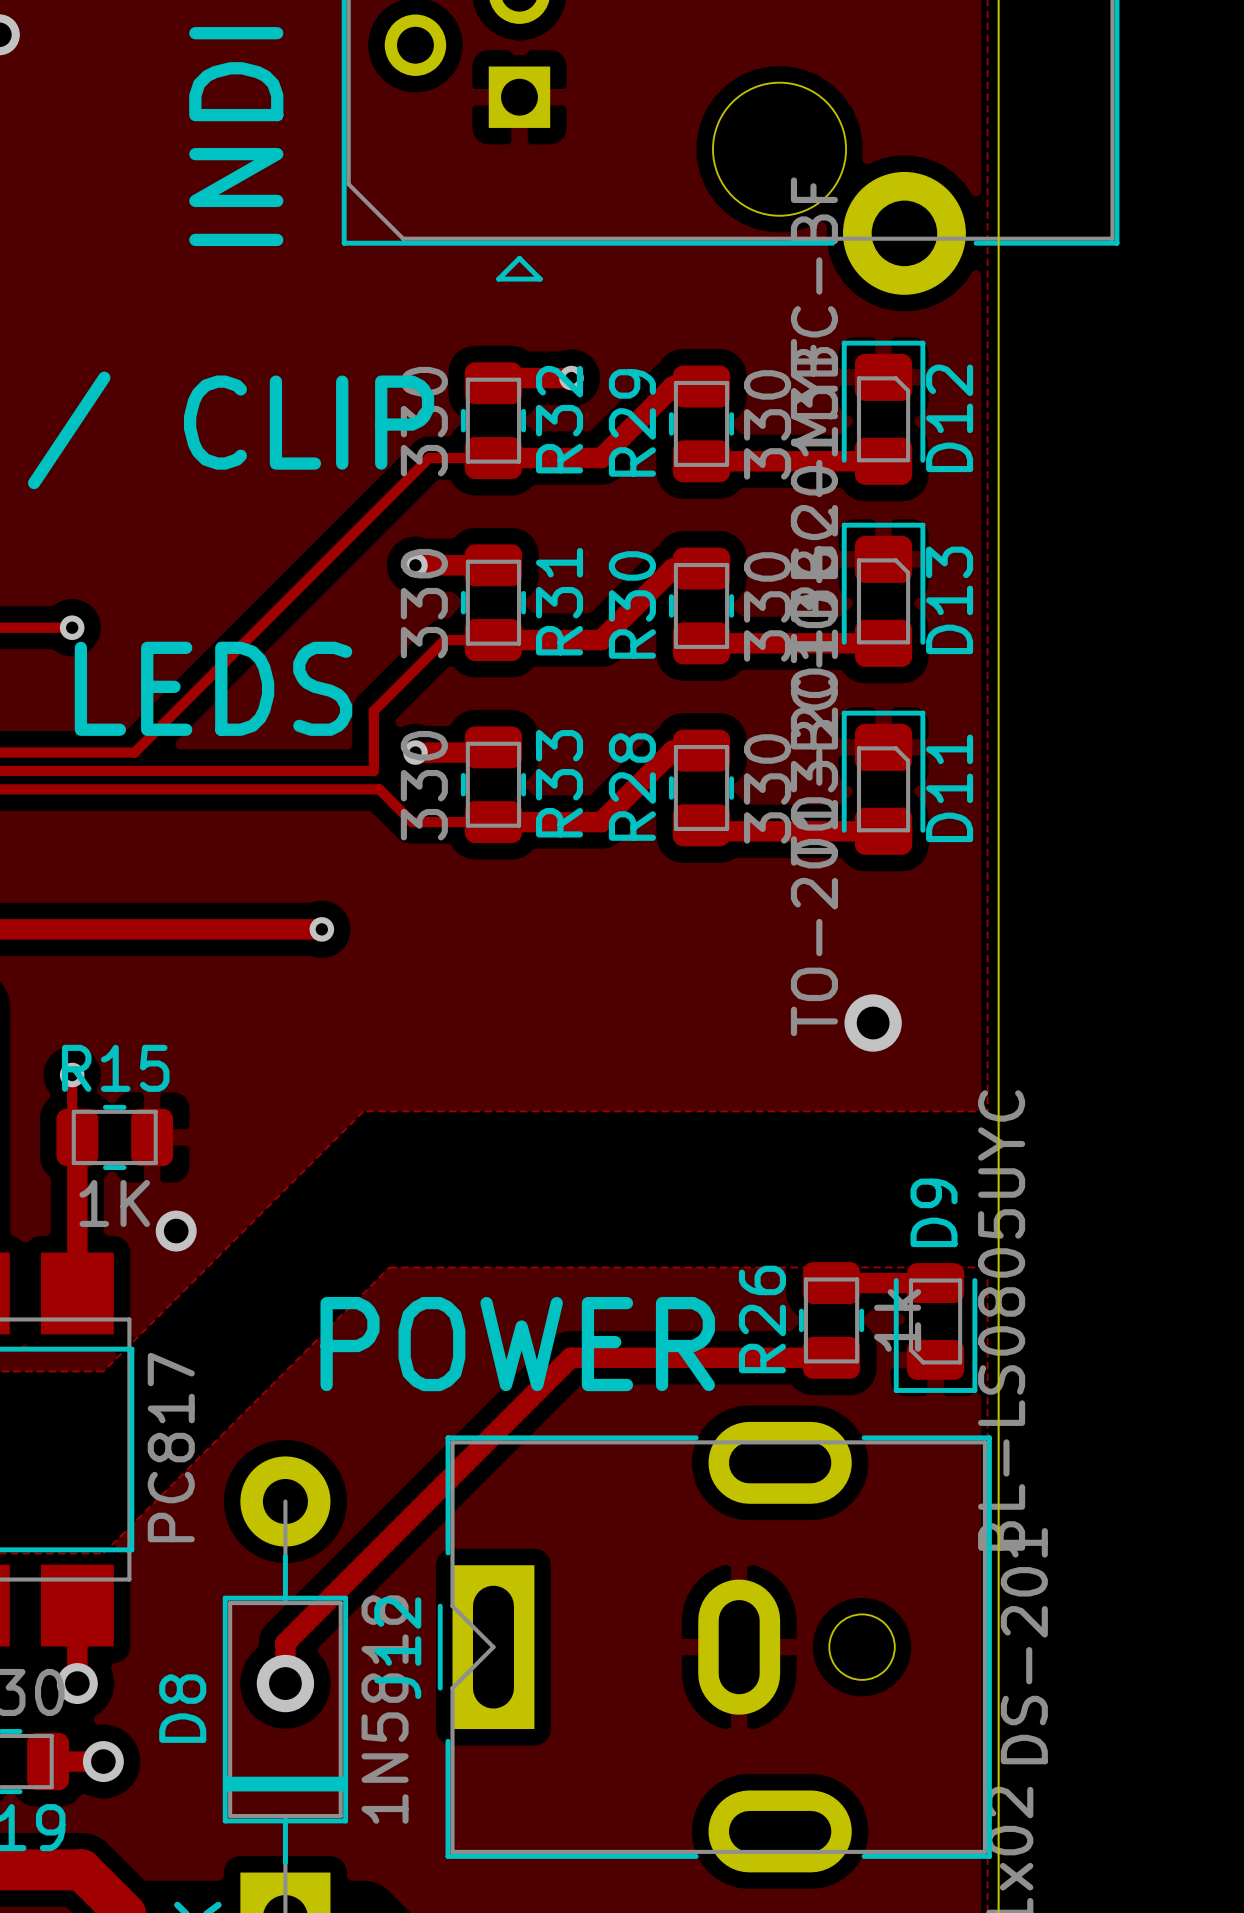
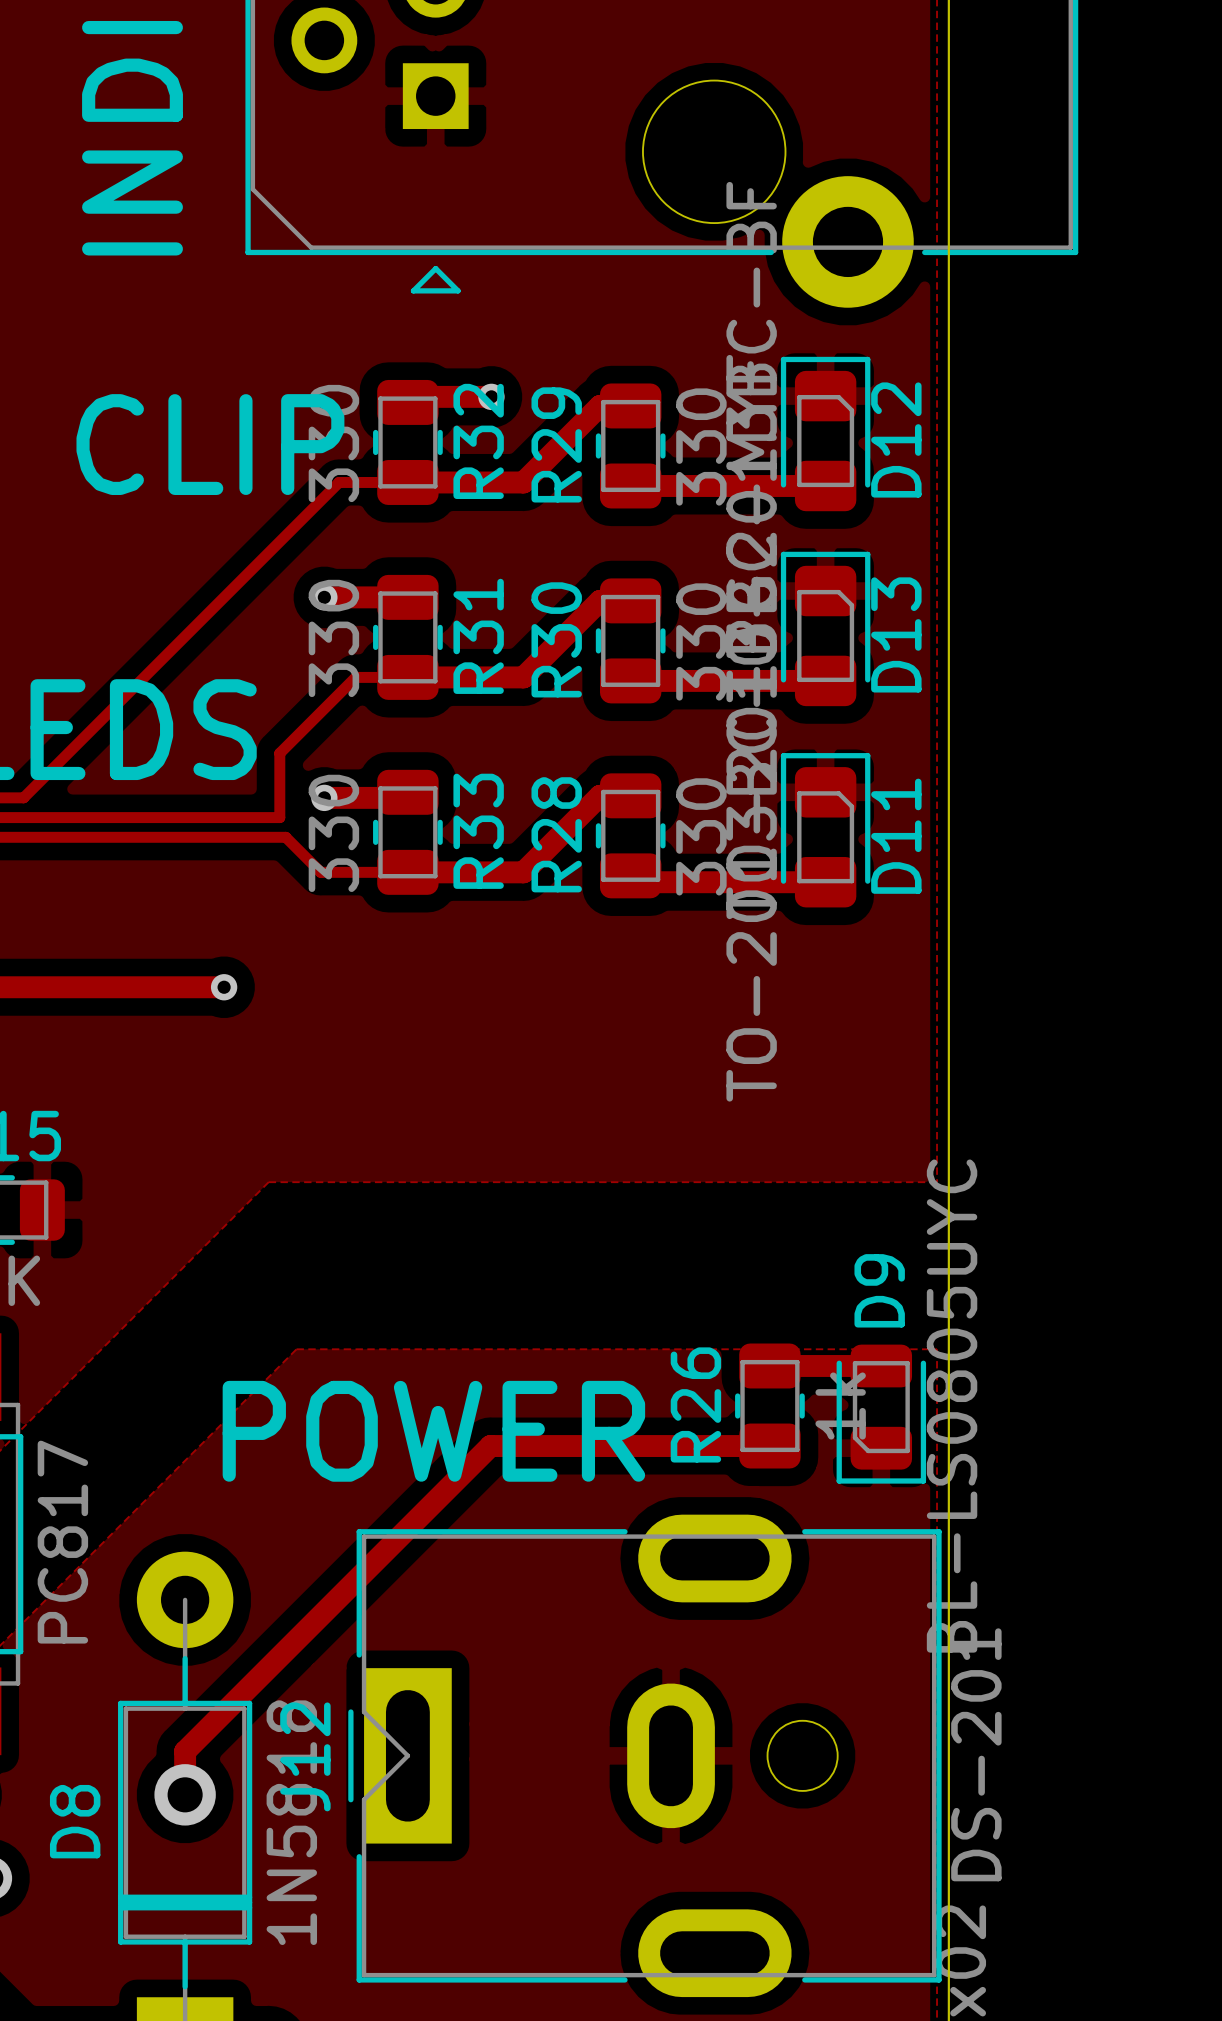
via: (873, 1023) -> none
via: (176, 1231) -> none

